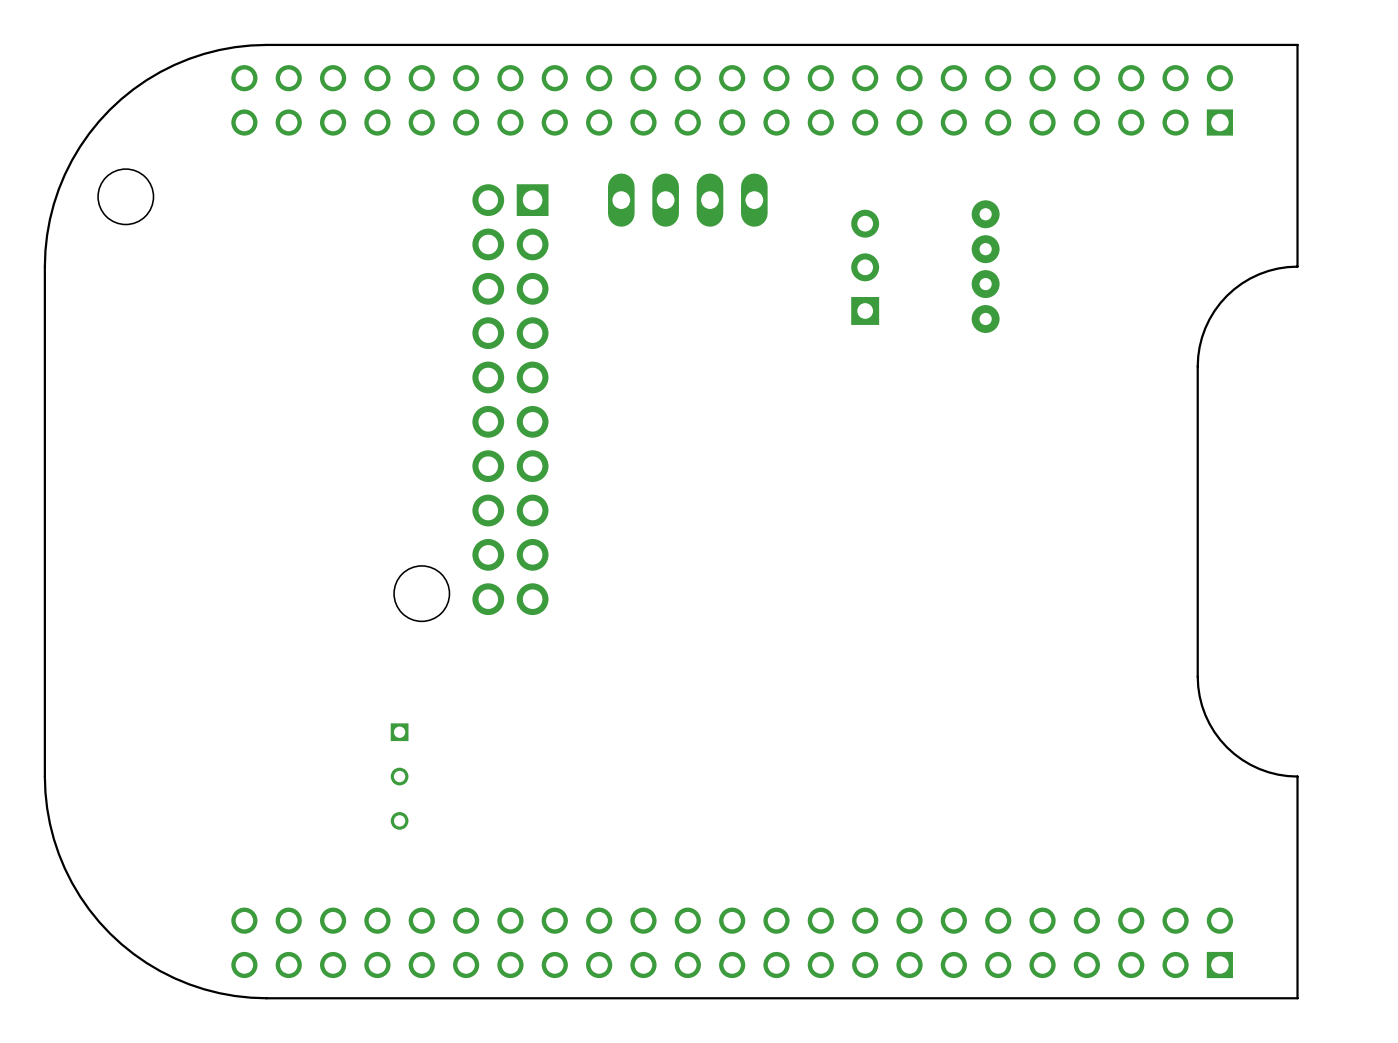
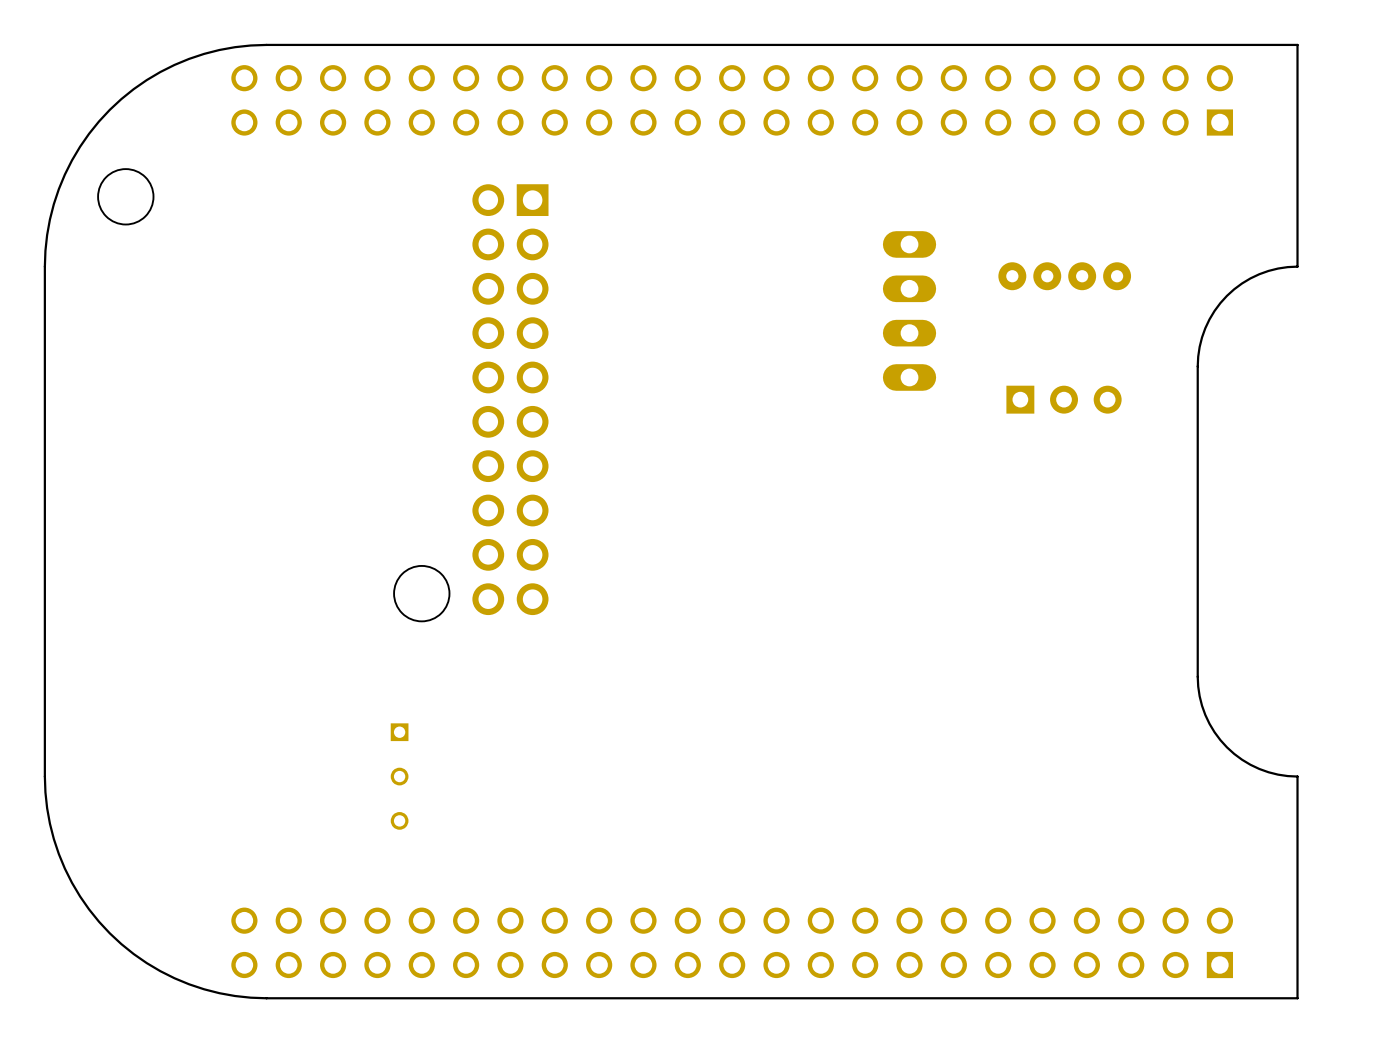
part rotation: 0° (687, 200) -> 90° clockwise (909, 310)
part position: (687, 200) -> (909, 310)
part rotation: 0° (985, 266) -> 90° clockwise (1064, 276)
part position: (985, 266) -> (1064, 276)
part rotation: 0° (865, 267) -> 90° clockwise (1064, 399)
part position: (865, 267) -> (1064, 399)

